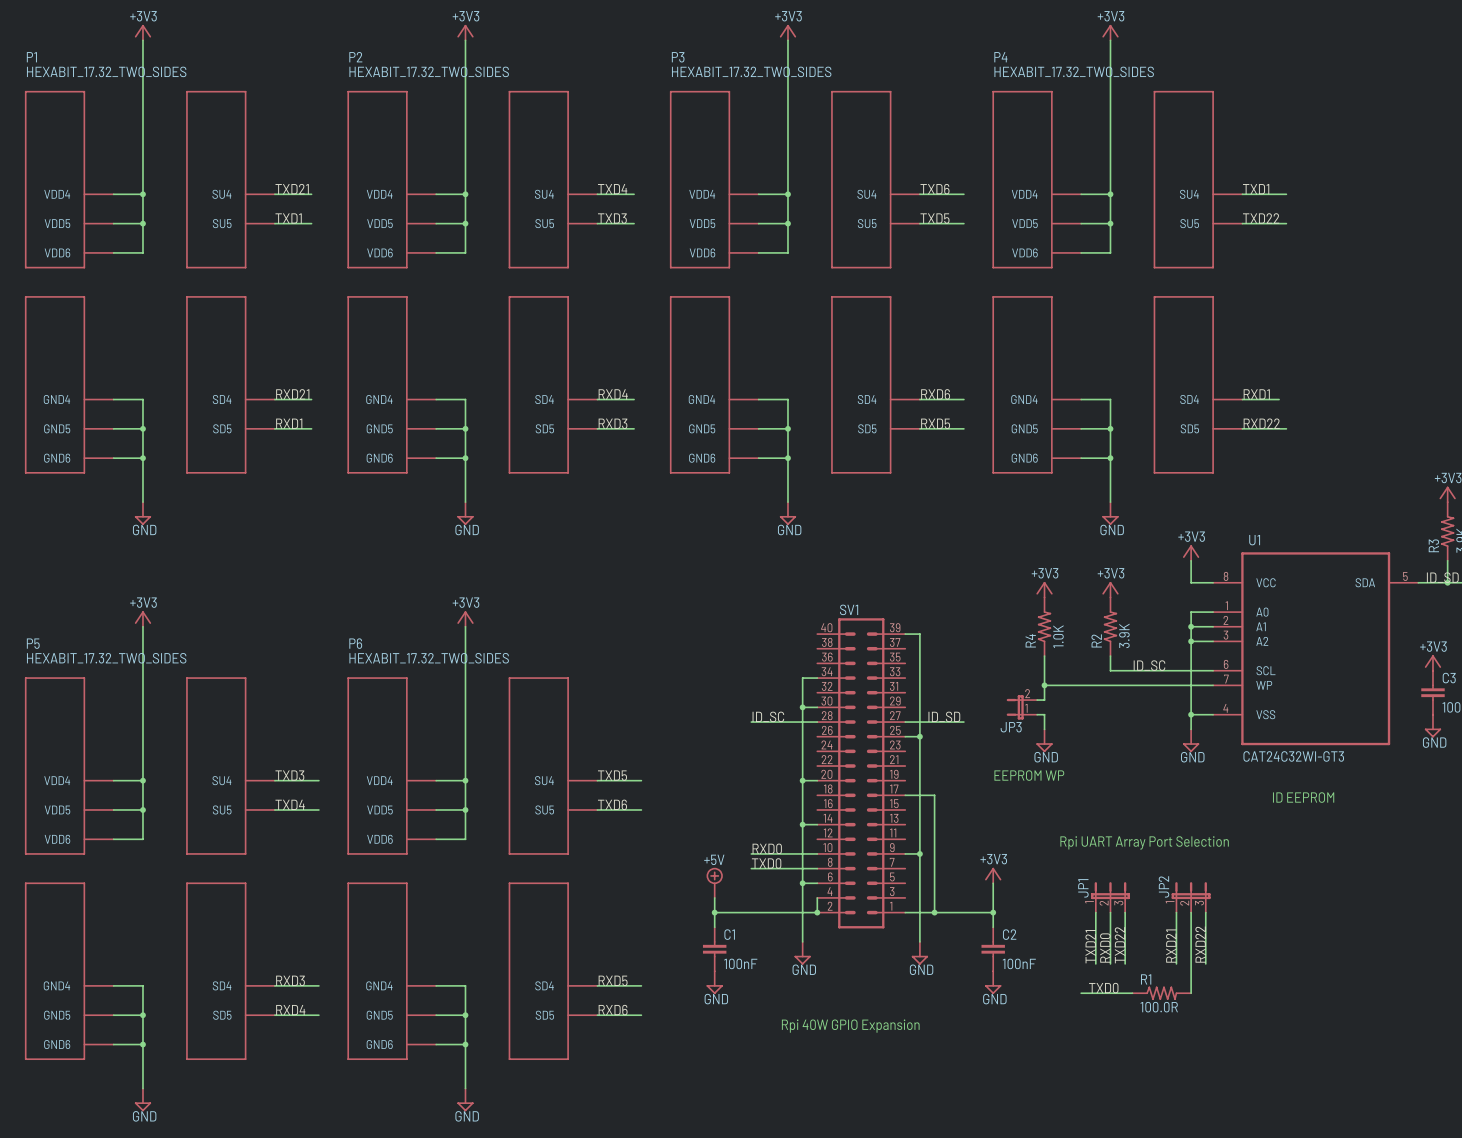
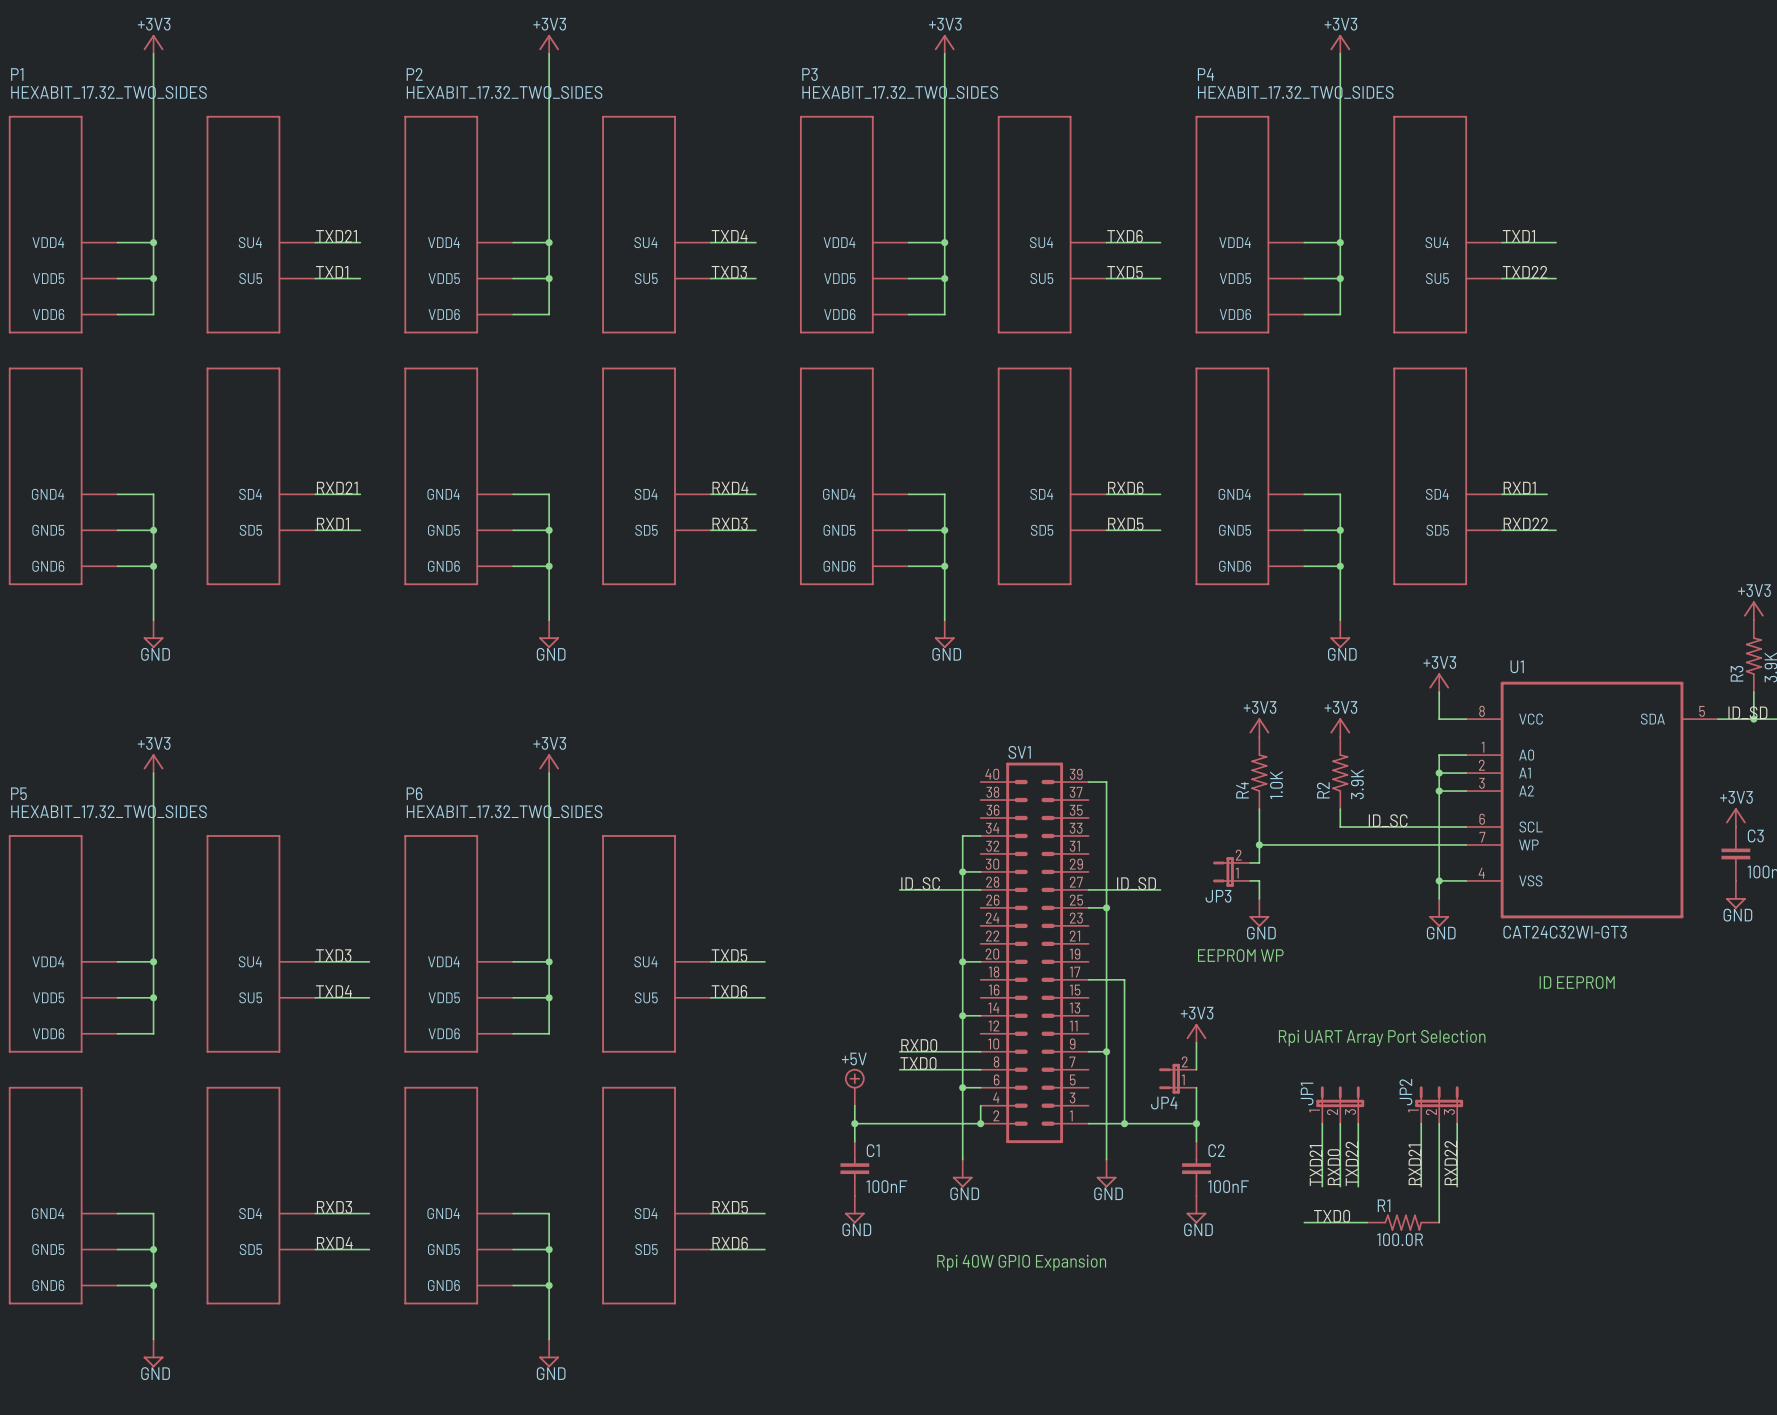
wire: none -> (1196, 1042) (1196, 1069)
JP4: none -> (1177, 1078)
power symbol position: +3V3 (993, 875) -> +3V3 (1196, 1033)

